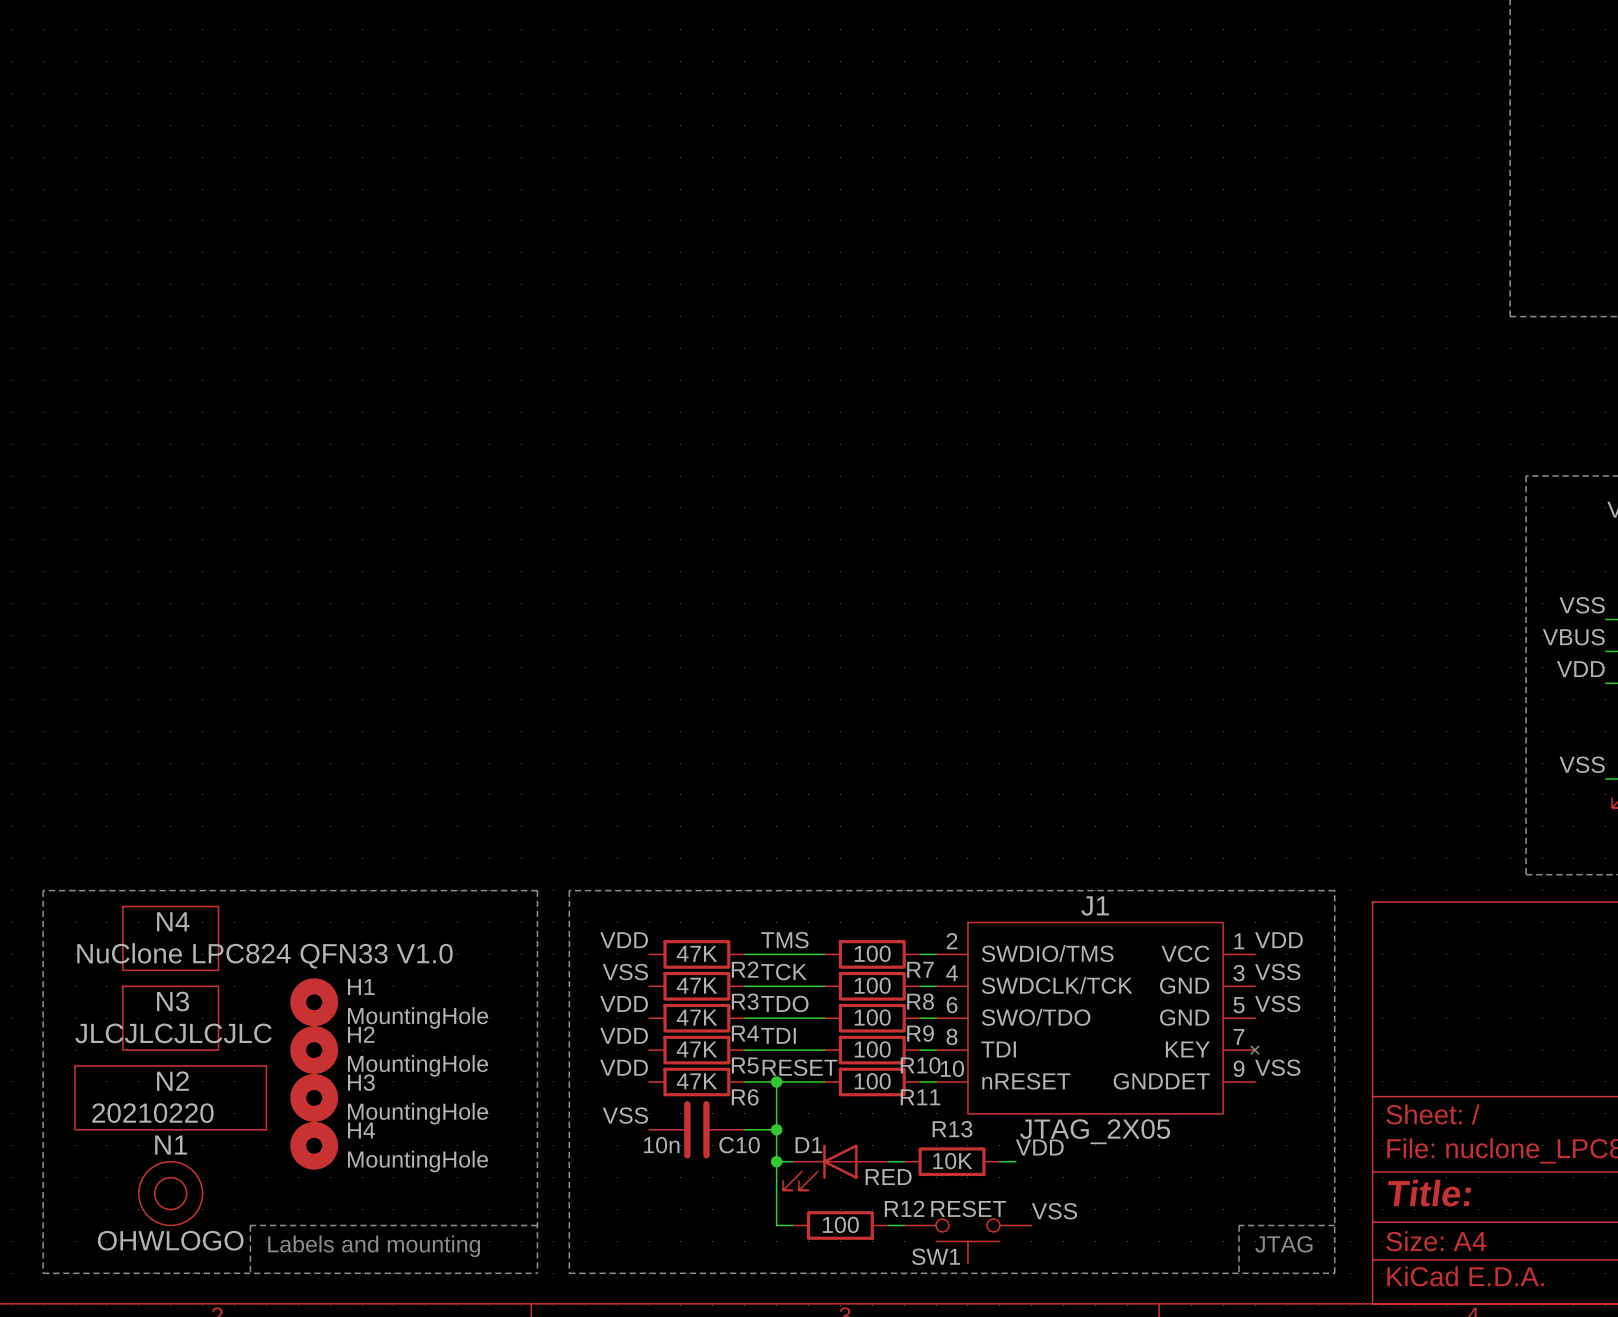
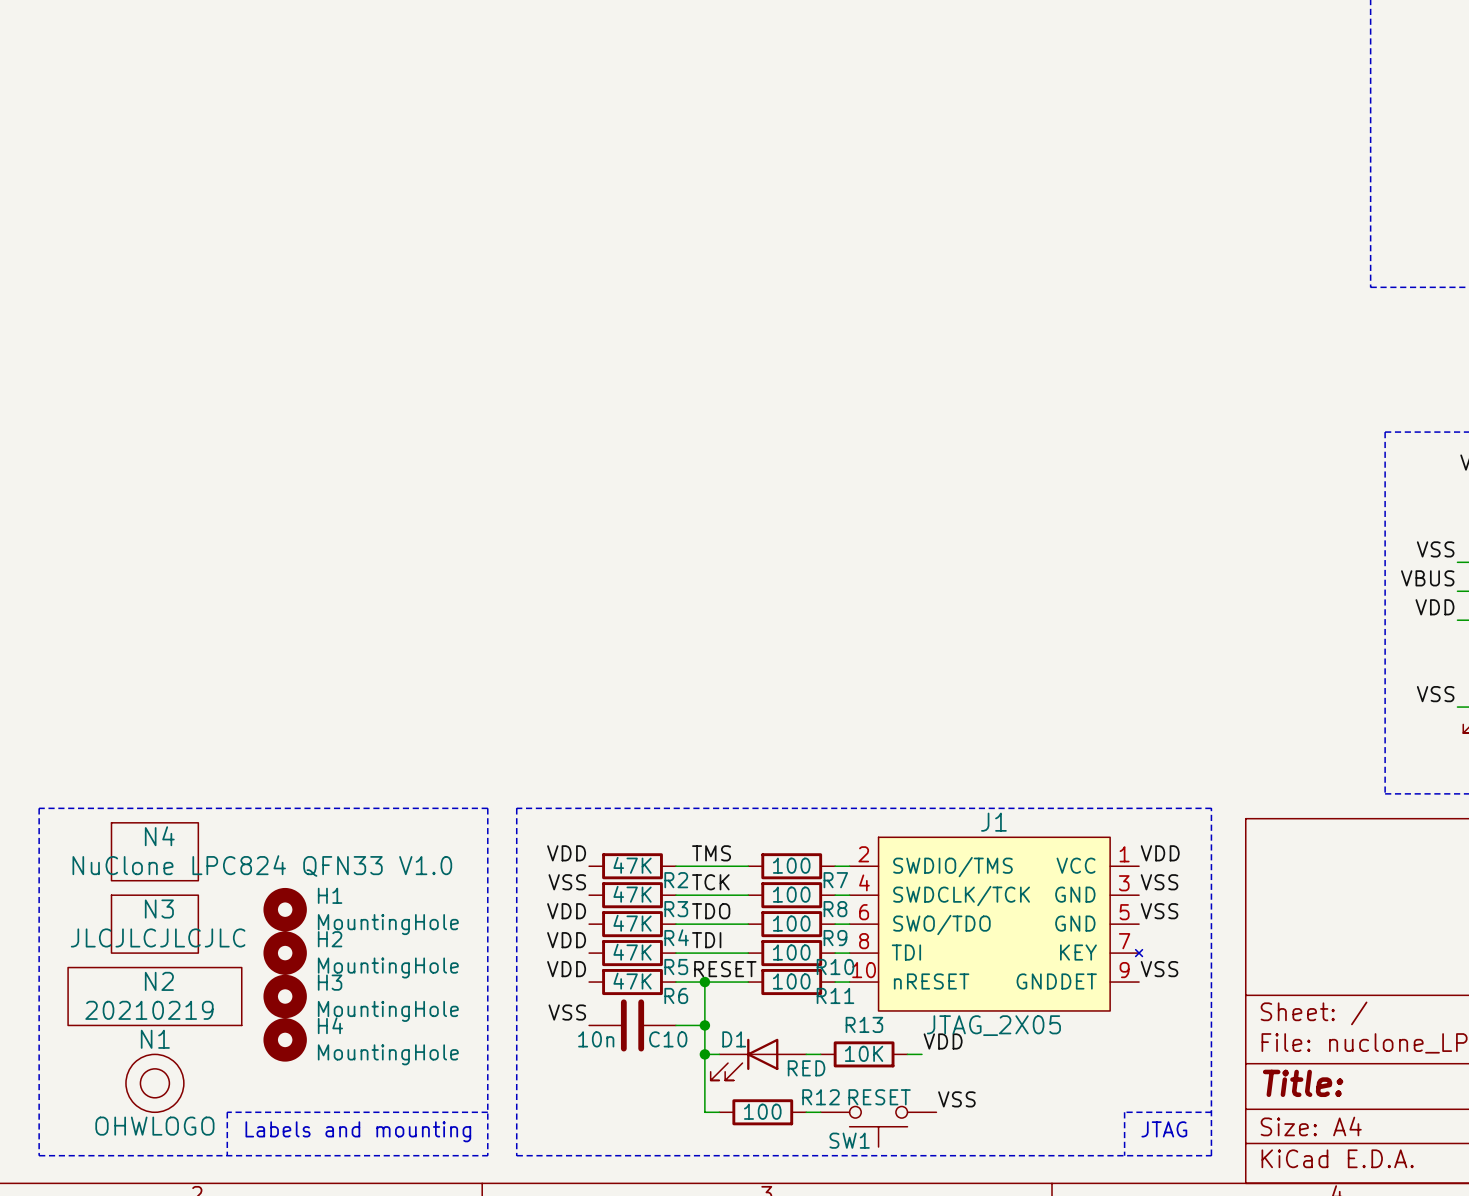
N2 value: 20210220 (152, 1113) -> 20210219 (149, 1010)

